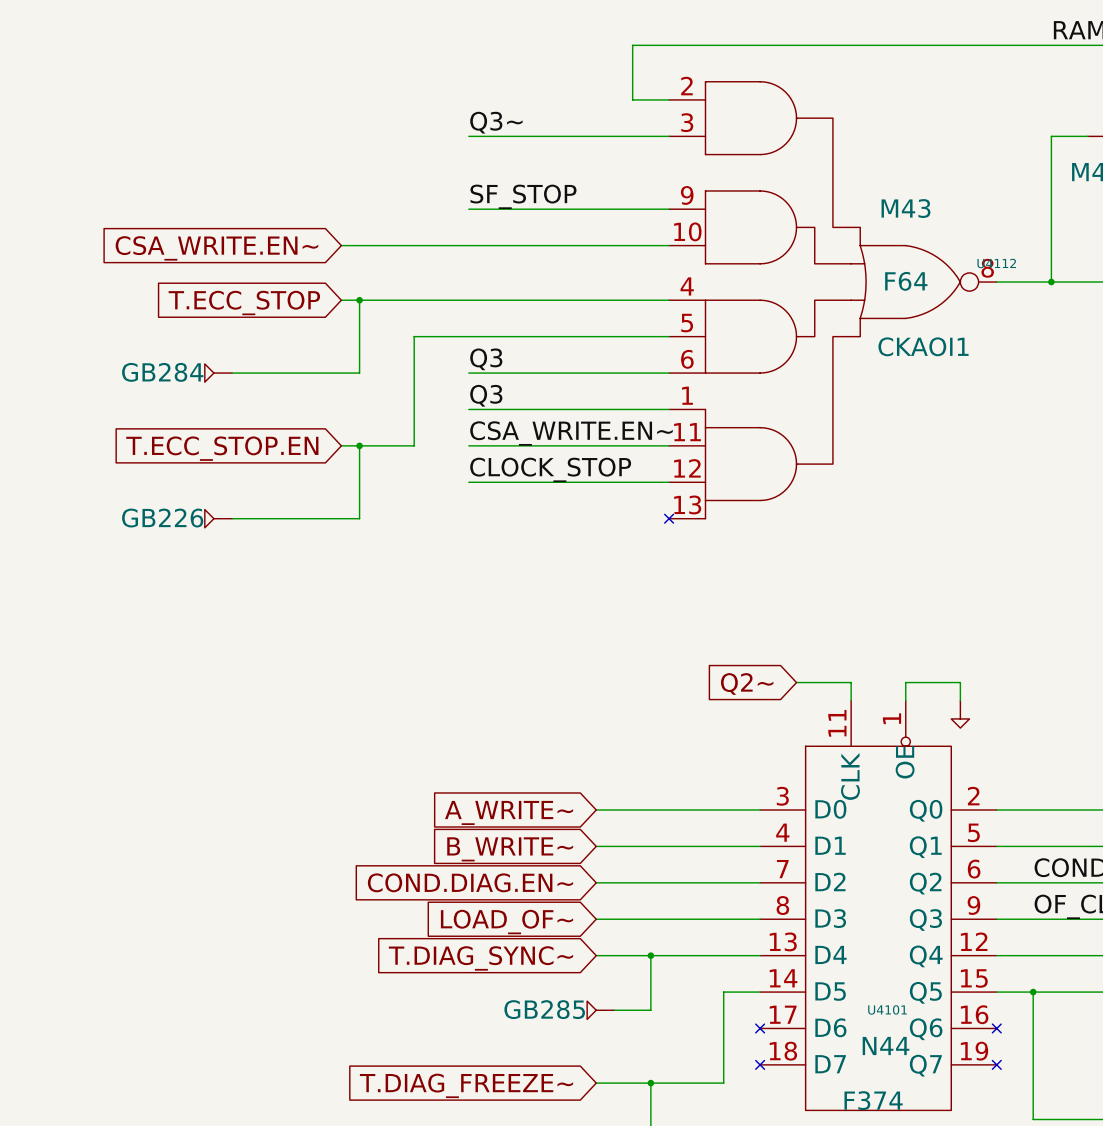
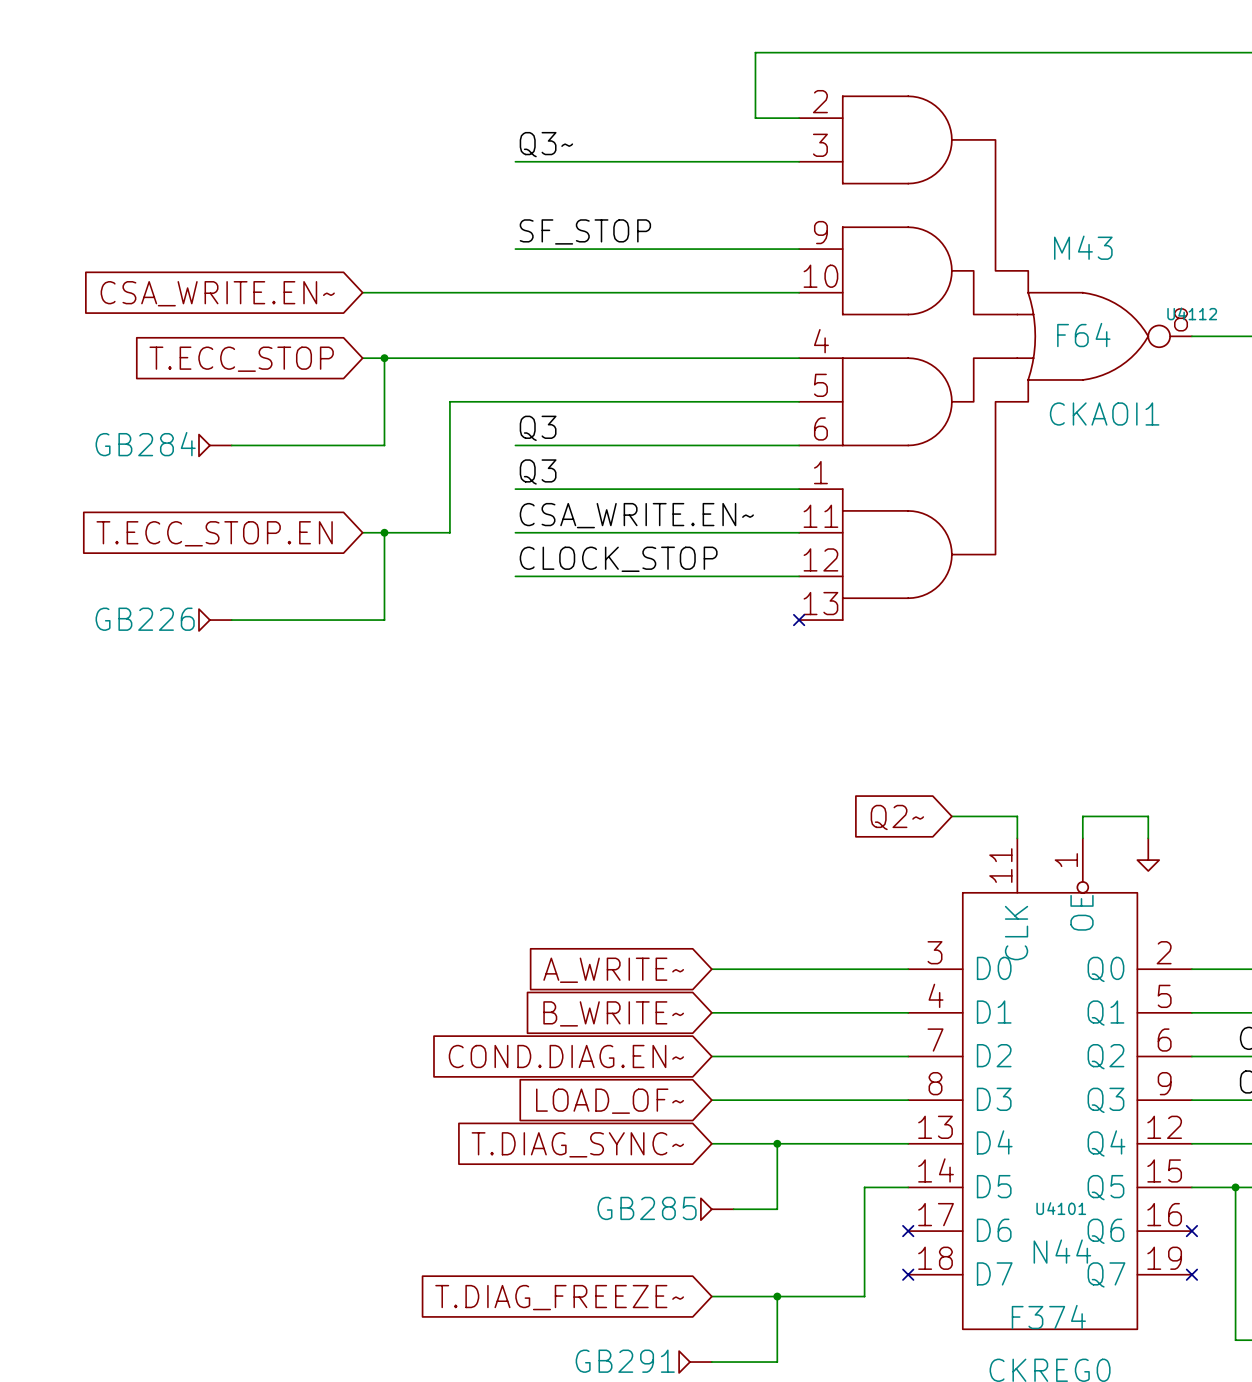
label position: Q3~ (496, 122) -> Q3~ (546, 144)
wire: none -> (515, 161) (559, 161)
label position: SF_STOP (523, 196) -> SF_STOP (585, 231)
wire: none -> (515, 249) (559, 249)
wire: none -> (362, 292) (406, 292)
global label position: CSA_WRITE.EN~ (216, 248) -> CSA_WRITE.EN~ (217, 293)
wire: none -> (362, 358) (406, 358)
wire: (359, 300) (359, 373) (323, 373) -> (384, 358) (384, 445)
junction position: (359, 300) -> (384, 358)
global label position: T.ECC_STOP (244, 303) -> T.ECC_STOP (241, 359)
wire: (414, 336) (414, 445) (377, 445) -> (493, 401) (449, 401) (449, 532)
label: none -> Q3 (538, 428)
label: Q3 (486, 359) -> none
GB284 position: (218, 373) -> (215, 445)
wire: none -> (515, 445) (559, 445)
label: none -> Q3 (538, 471)
label: Q3 (486, 395) -> none
wire: none -> (515, 489) (559, 489)
label position: CSA_WRITE.EN~ (571, 433) -> CSA_WRITE.EN~ (636, 515)
wire: none -> (362, 532) (406, 532)
wire: (359, 445) (359, 518) (323, 518) -> (384, 532) (384, 620)
junction position: (359, 445) -> (384, 532)
wire: none -> (515, 532) (559, 532)
global label position: T.ECC_STOP.EN (222, 448) -> T.ECC_STOP.EN (214, 533)
label position: CLOCK_STOP (550, 469) -> CLOCK_STOP (618, 559)
wire: none -> (515, 576) (559, 576)
GB226 position: (218, 518) -> (215, 620)

